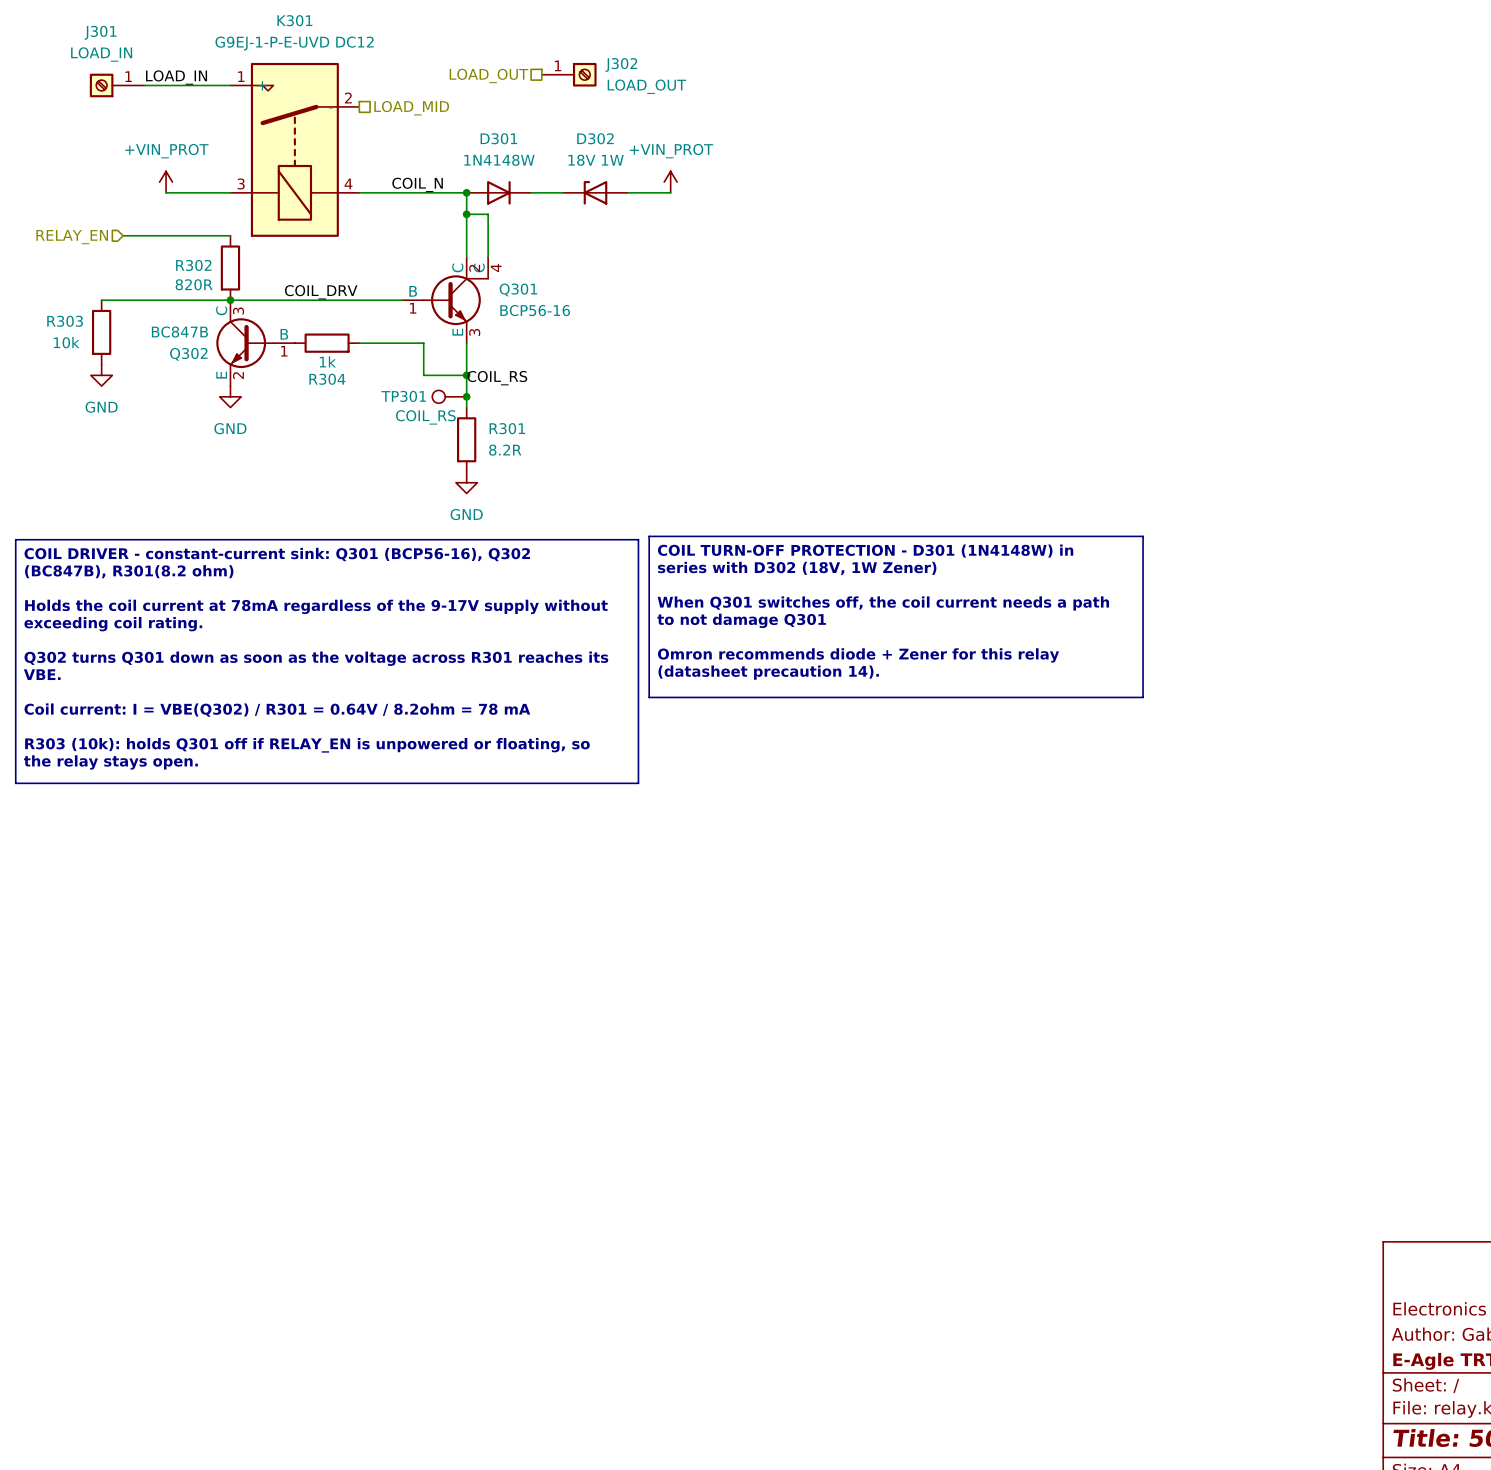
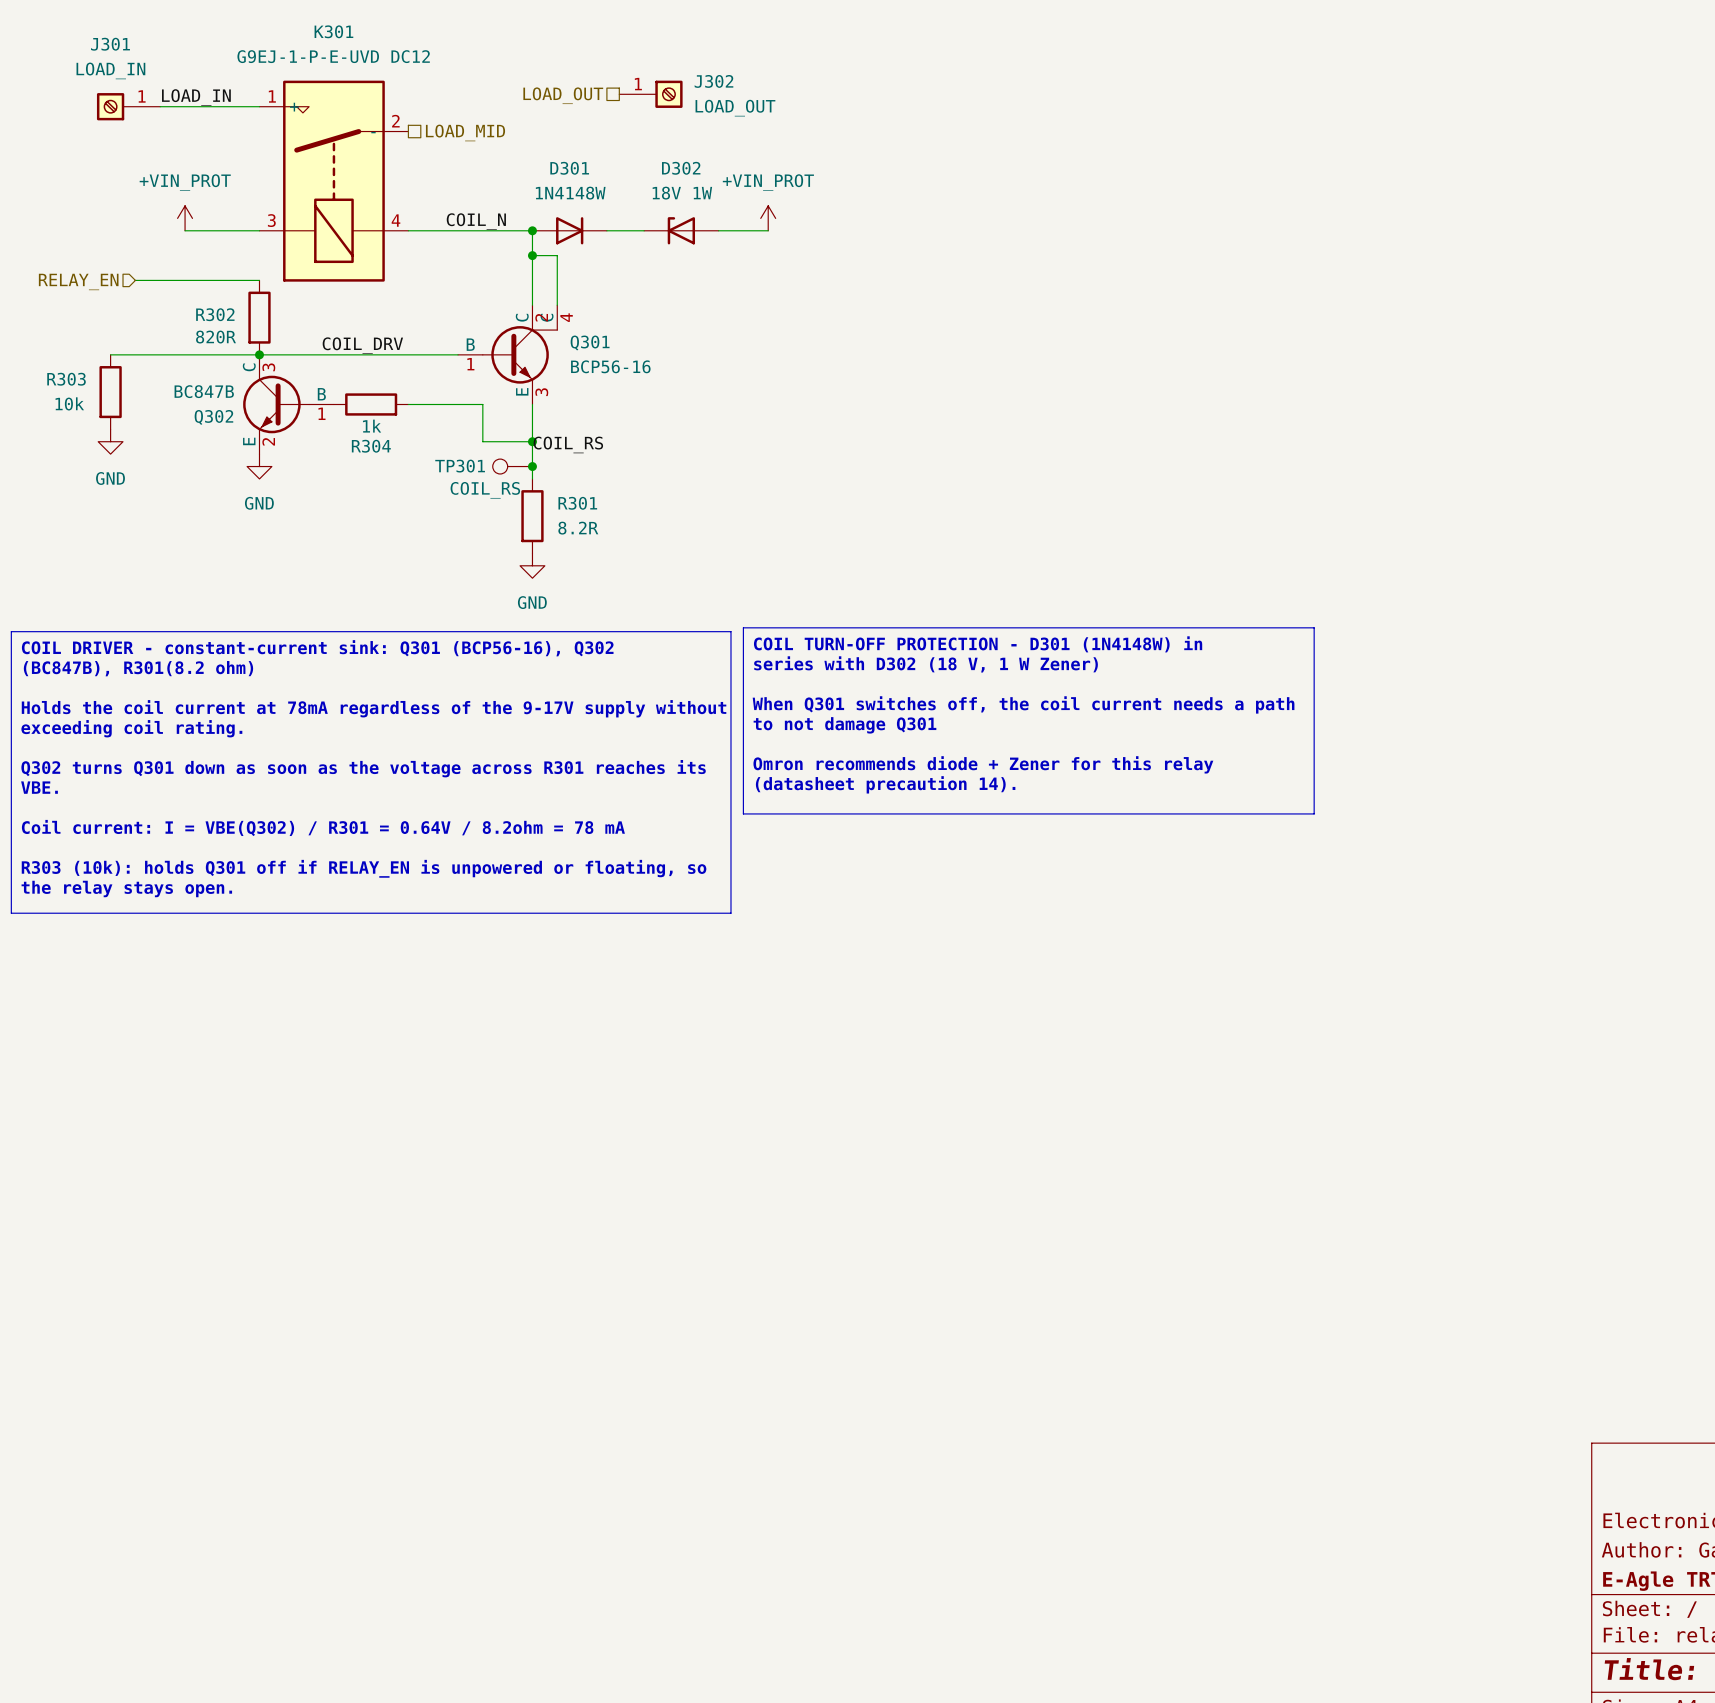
text: series with D302 (18V, 1W Zener) (797, 568) -> series with D302 (18 V, 1 W Zener) (926, 664)

